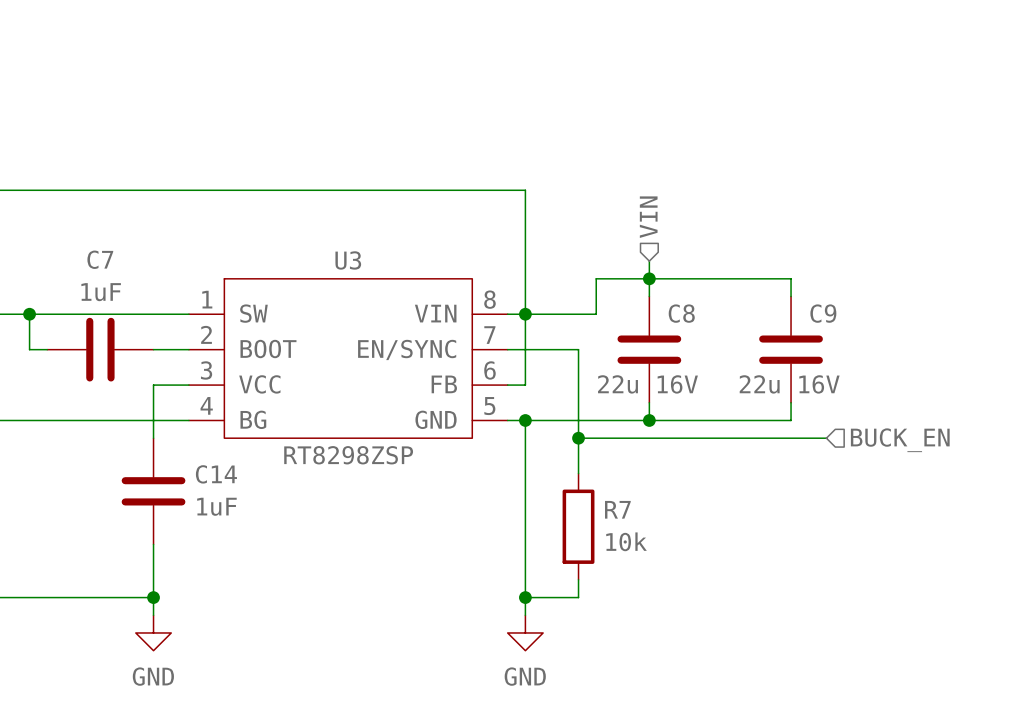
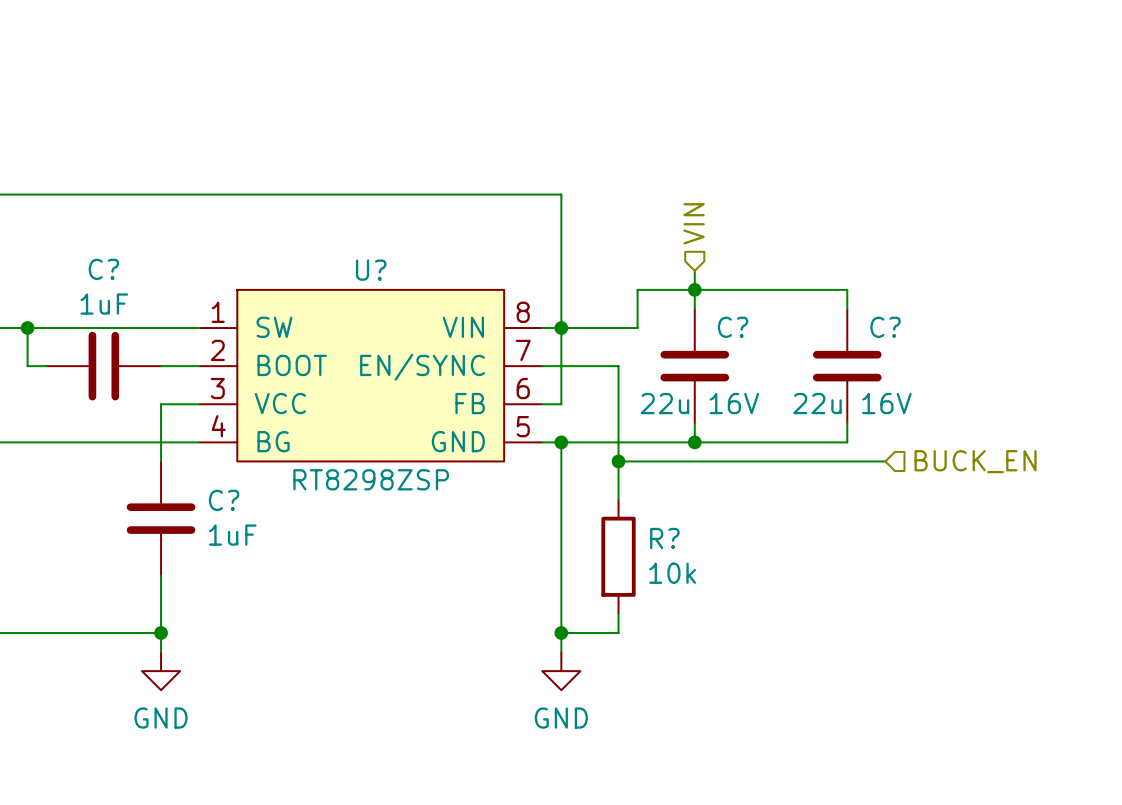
C7 name: C7 (100, 259) -> C? (103, 269)
U3 name: U3 (348, 260) -> U? (371, 270)
C8 name: C8 (681, 313) -> C? (733, 327)
C9 name: C9 (823, 313) -> C? (885, 327)
C14 name: C14 (216, 474) -> C? (224, 500)
R7 name: R7 (617, 509) -> R? (664, 538)

